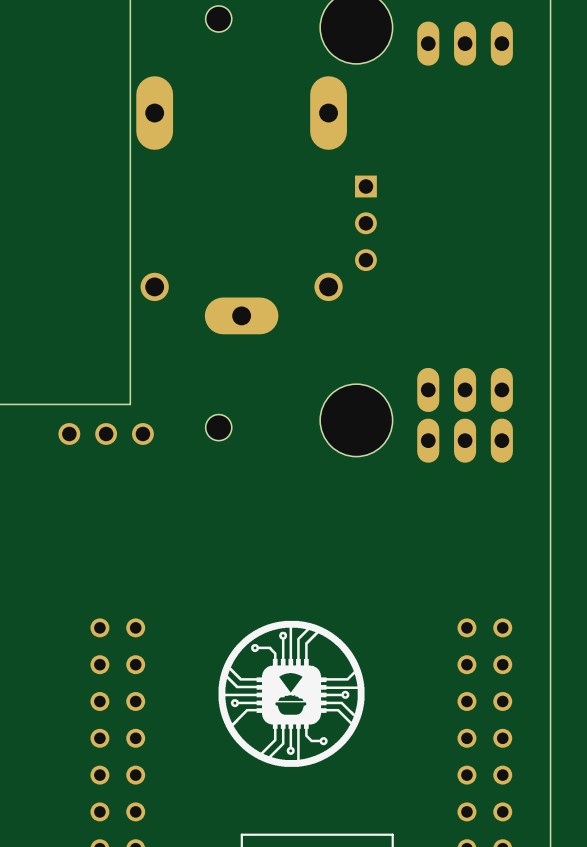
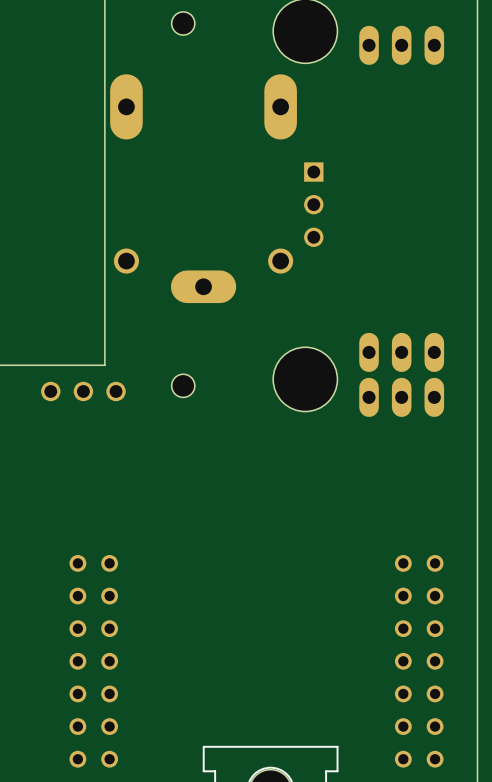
drawing: [218, 620, 365, 767] -> none

